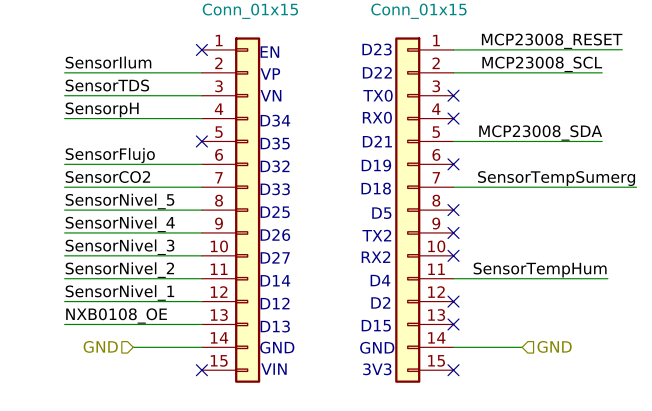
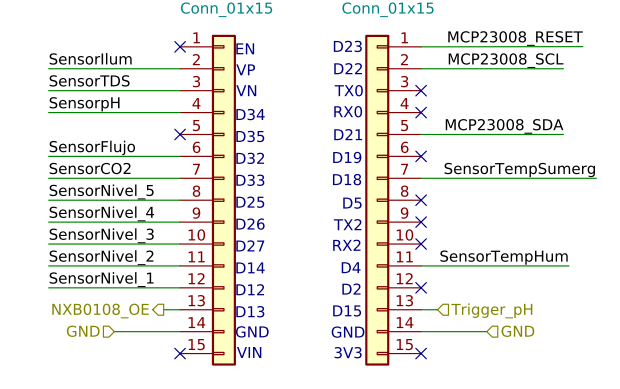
label: NXB0108_OE (116, 316) -> none
wire: (64, 324) (184, 324) -> none
wire: none -> (421, 309) (437, 309)
no-connect mark: (453, 324) -> none
hierarchical label: none -> NXB0108_OE (100, 311)
hierarchical label: none -> Trigger_pH (491, 310)

